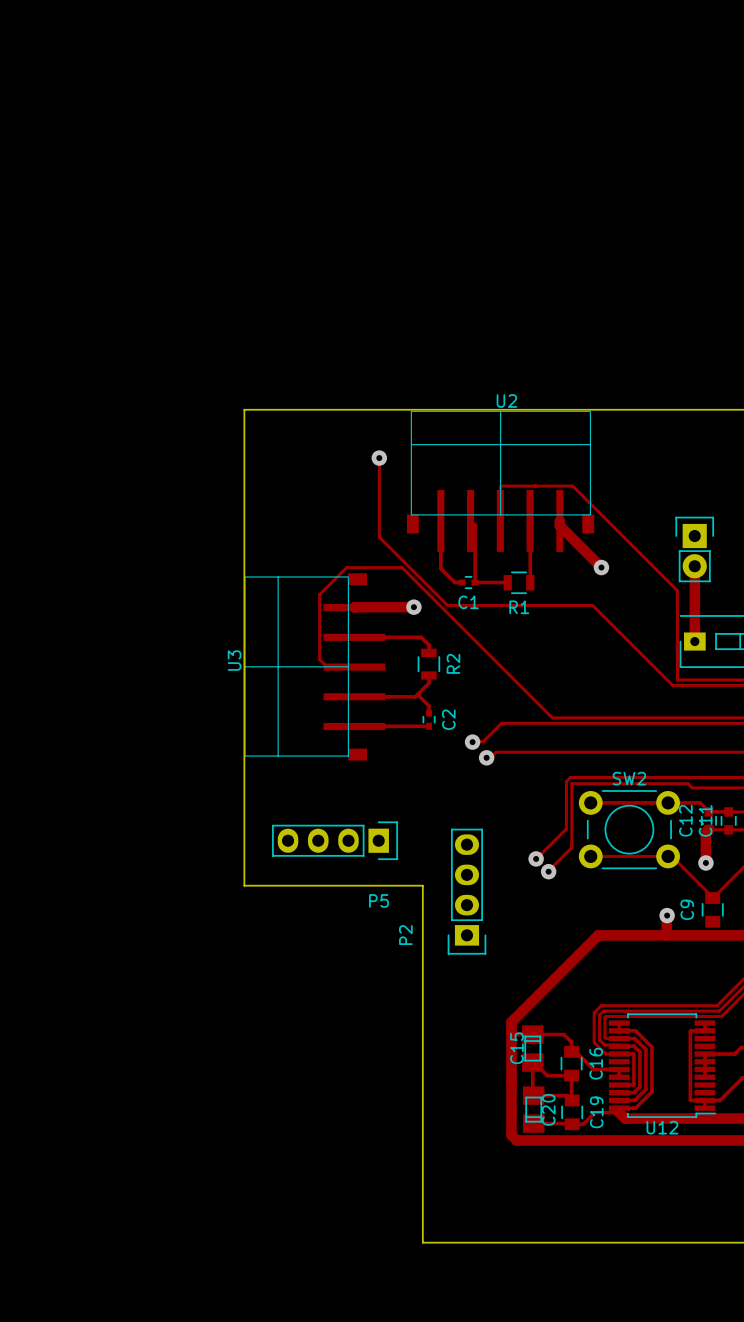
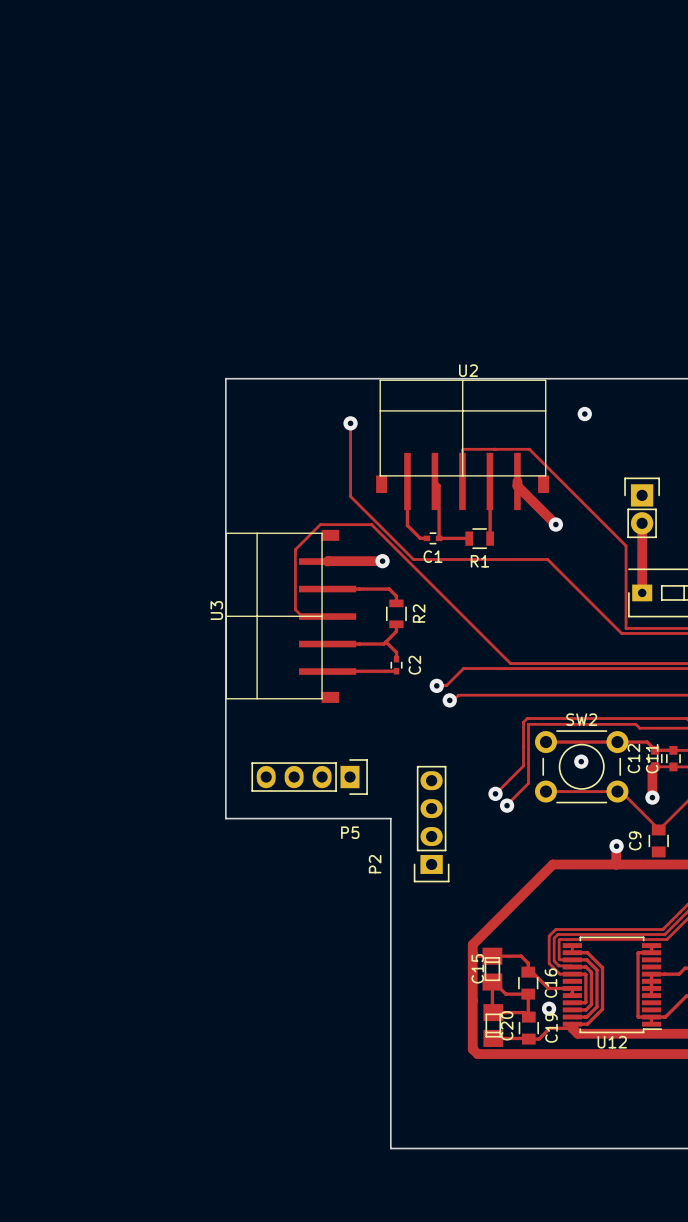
via: none -> (584, 414)
via: none -> (581, 761)
via: none -> (549, 1008)

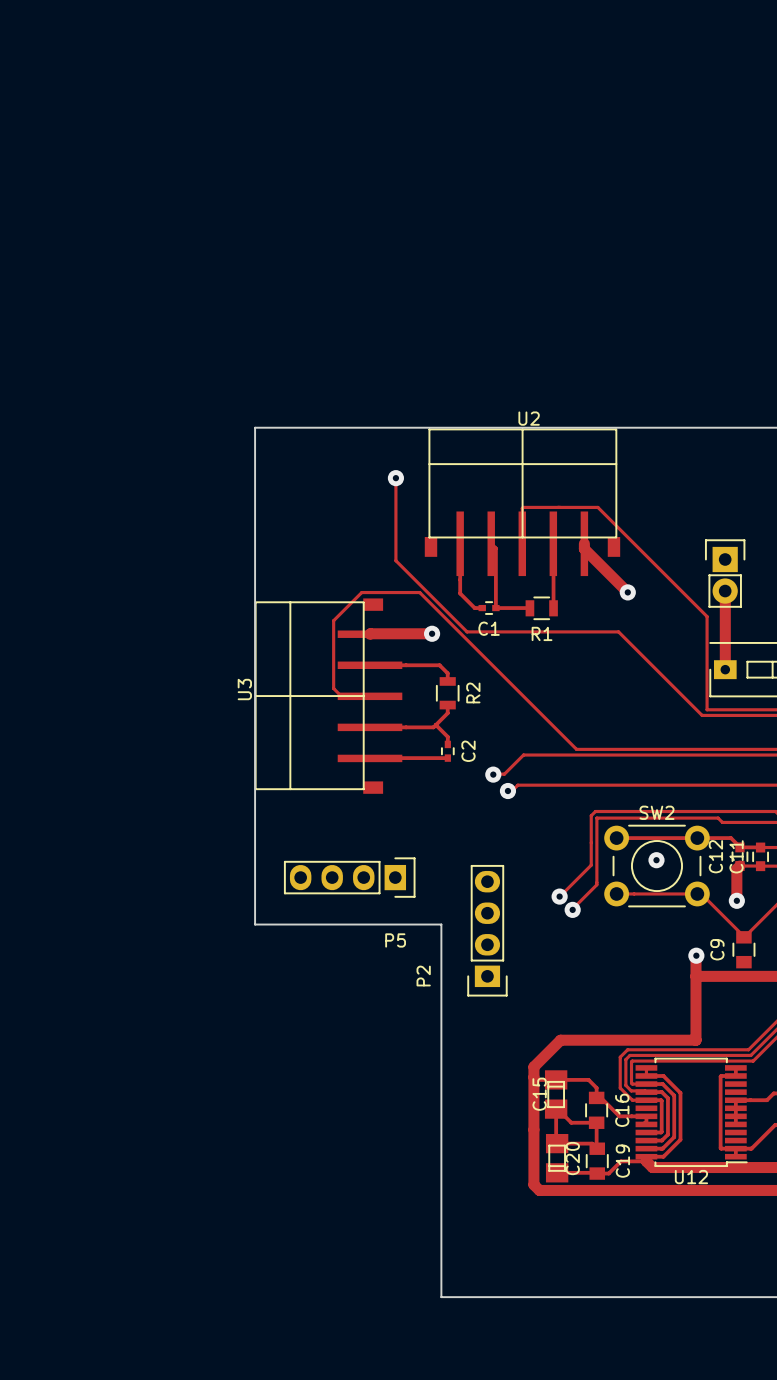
via: (584, 414) -> none
track: (616, 864) (552, 864) (496, 921) -> (696, 976) (696, 1040) (560, 1040)
via: (549, 1008) -> none

